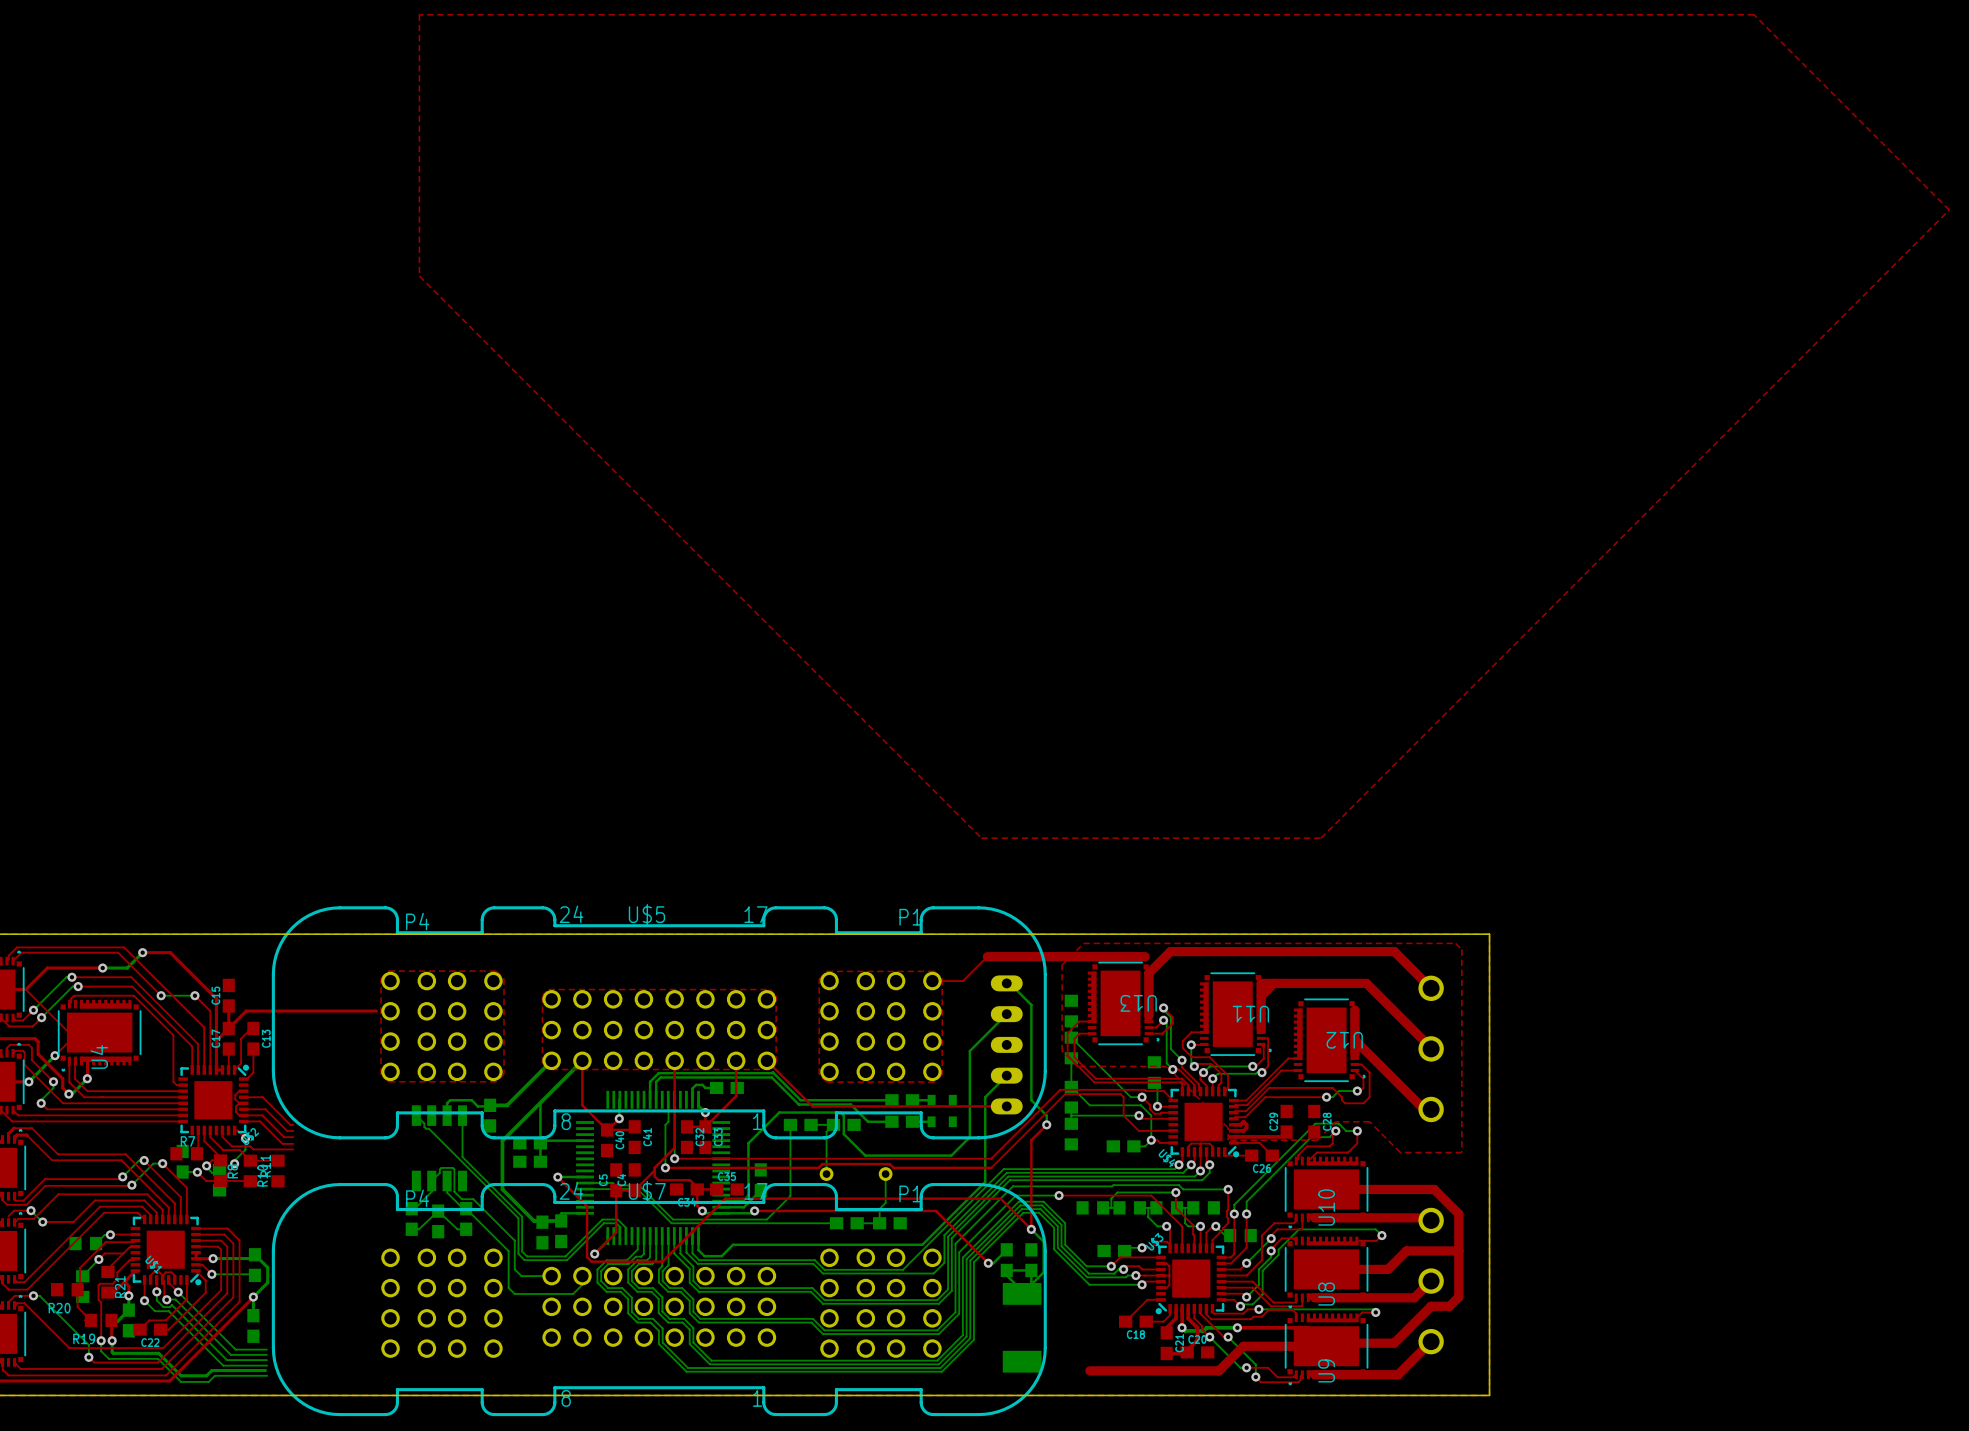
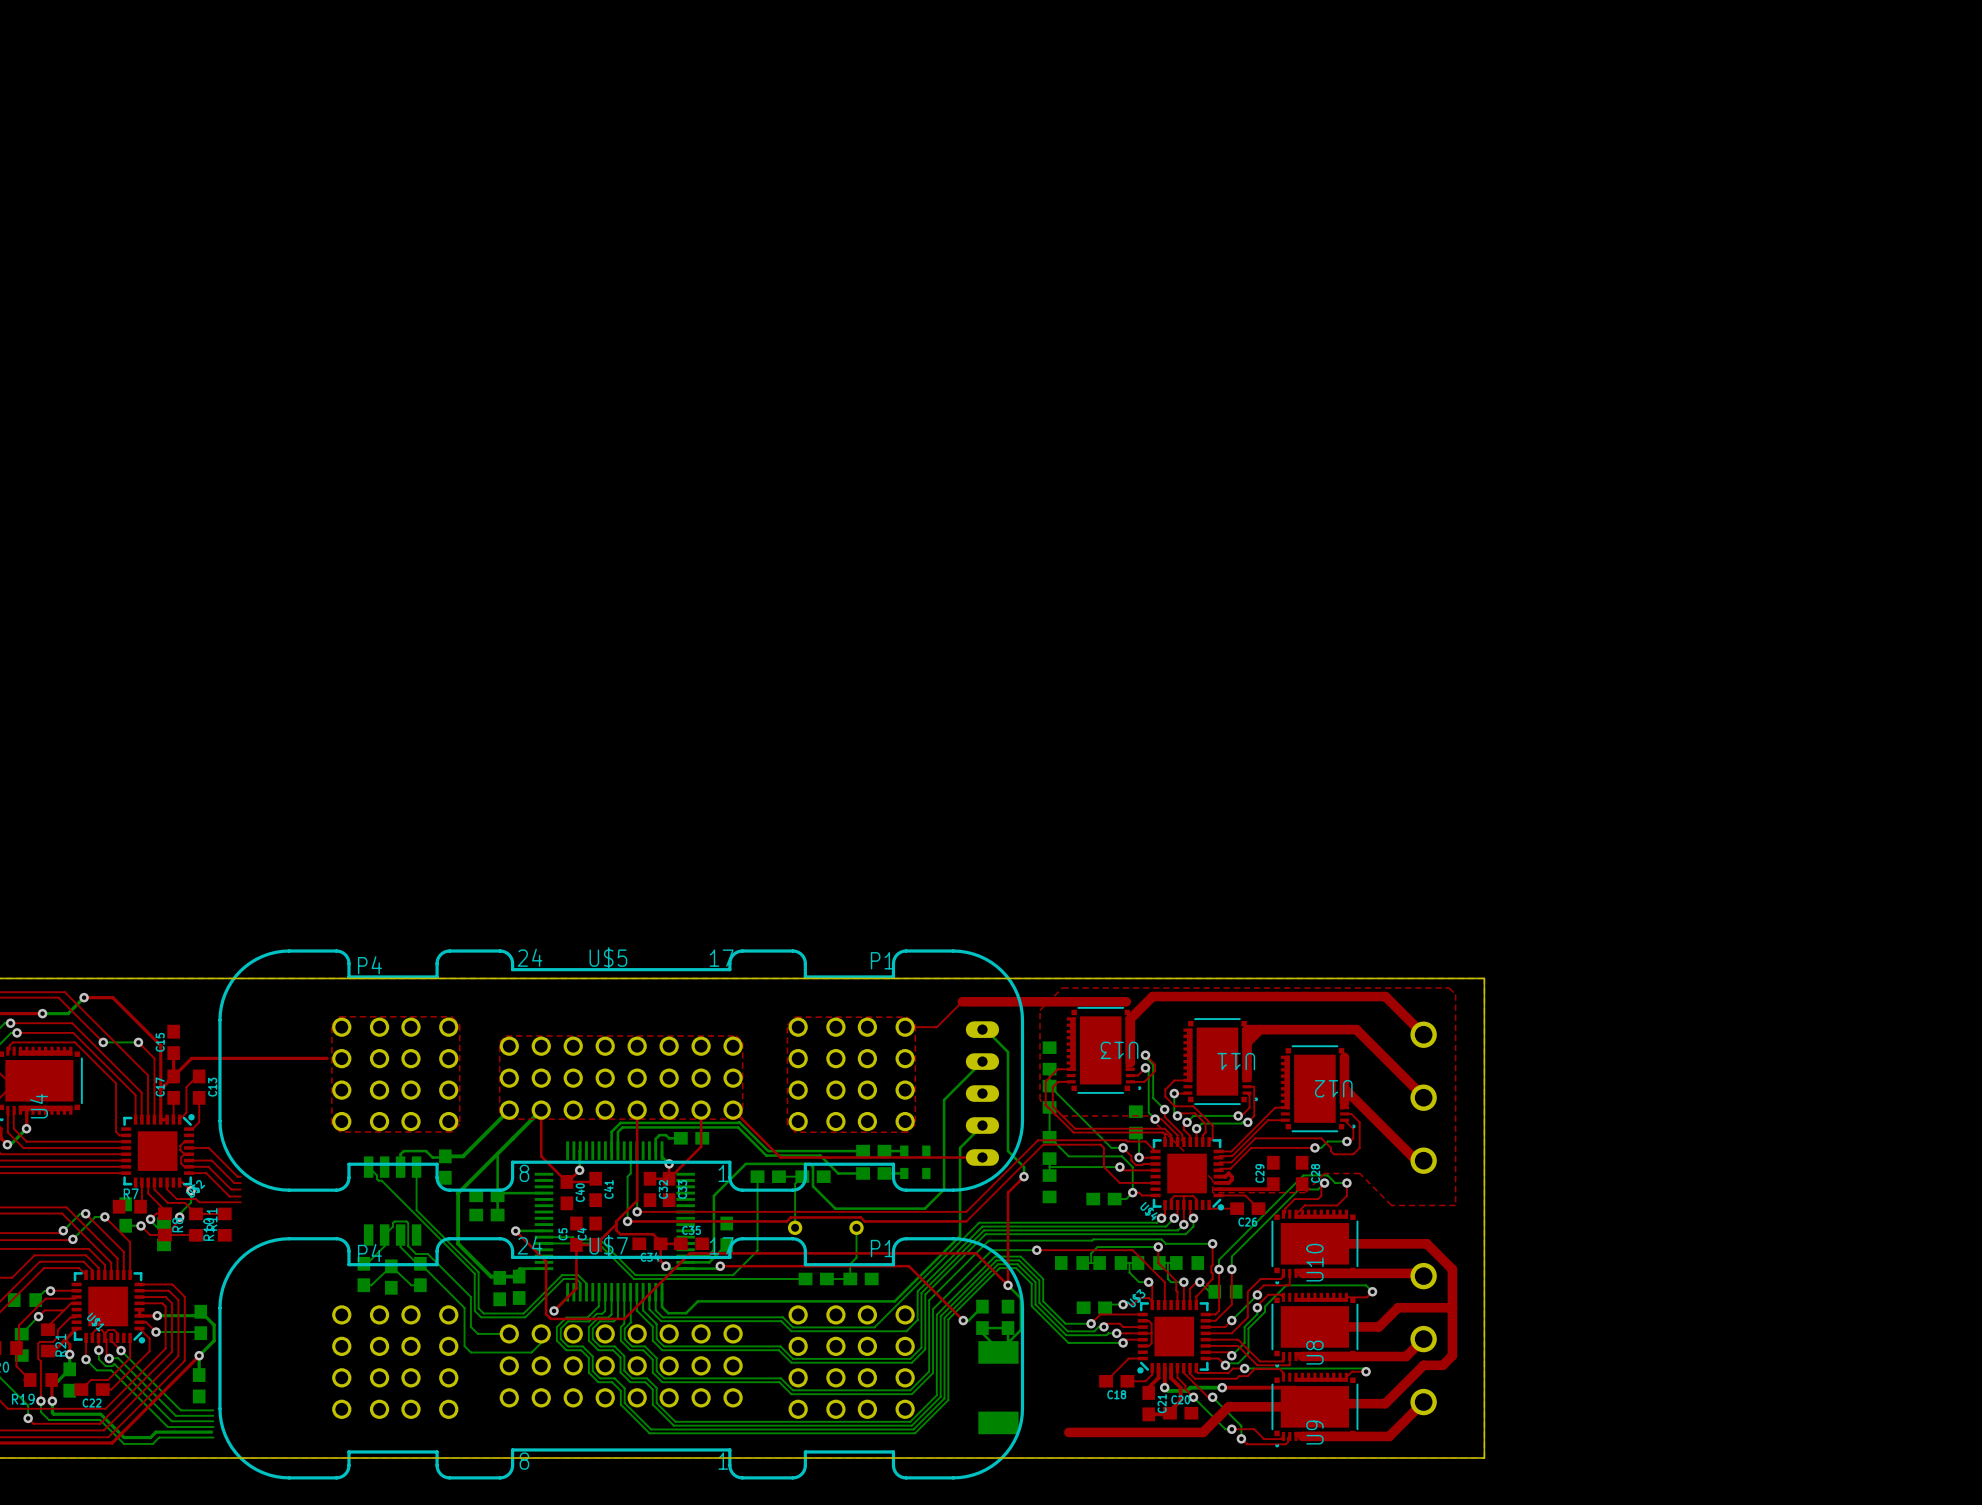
top zone outline: (419, 14) (419, 276) (981, 838) (1321, 838) (1949, 210) (1754, 14) (419, 14) -> none

